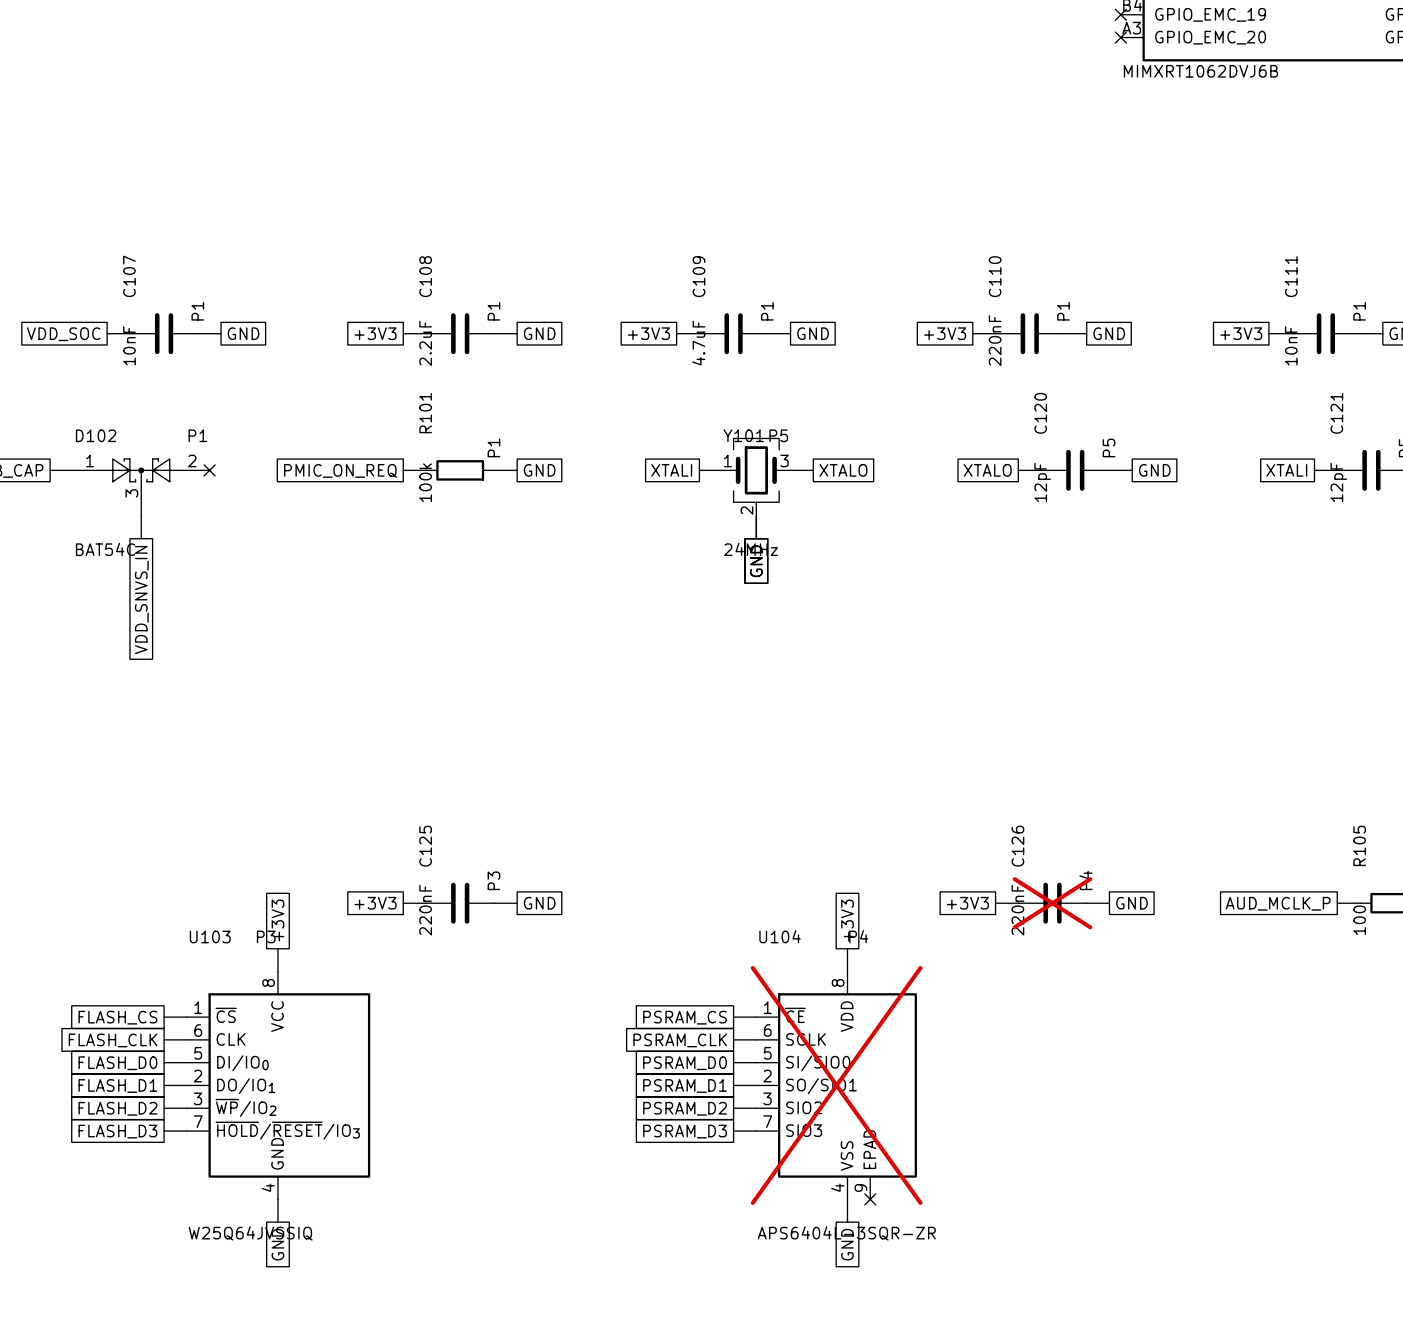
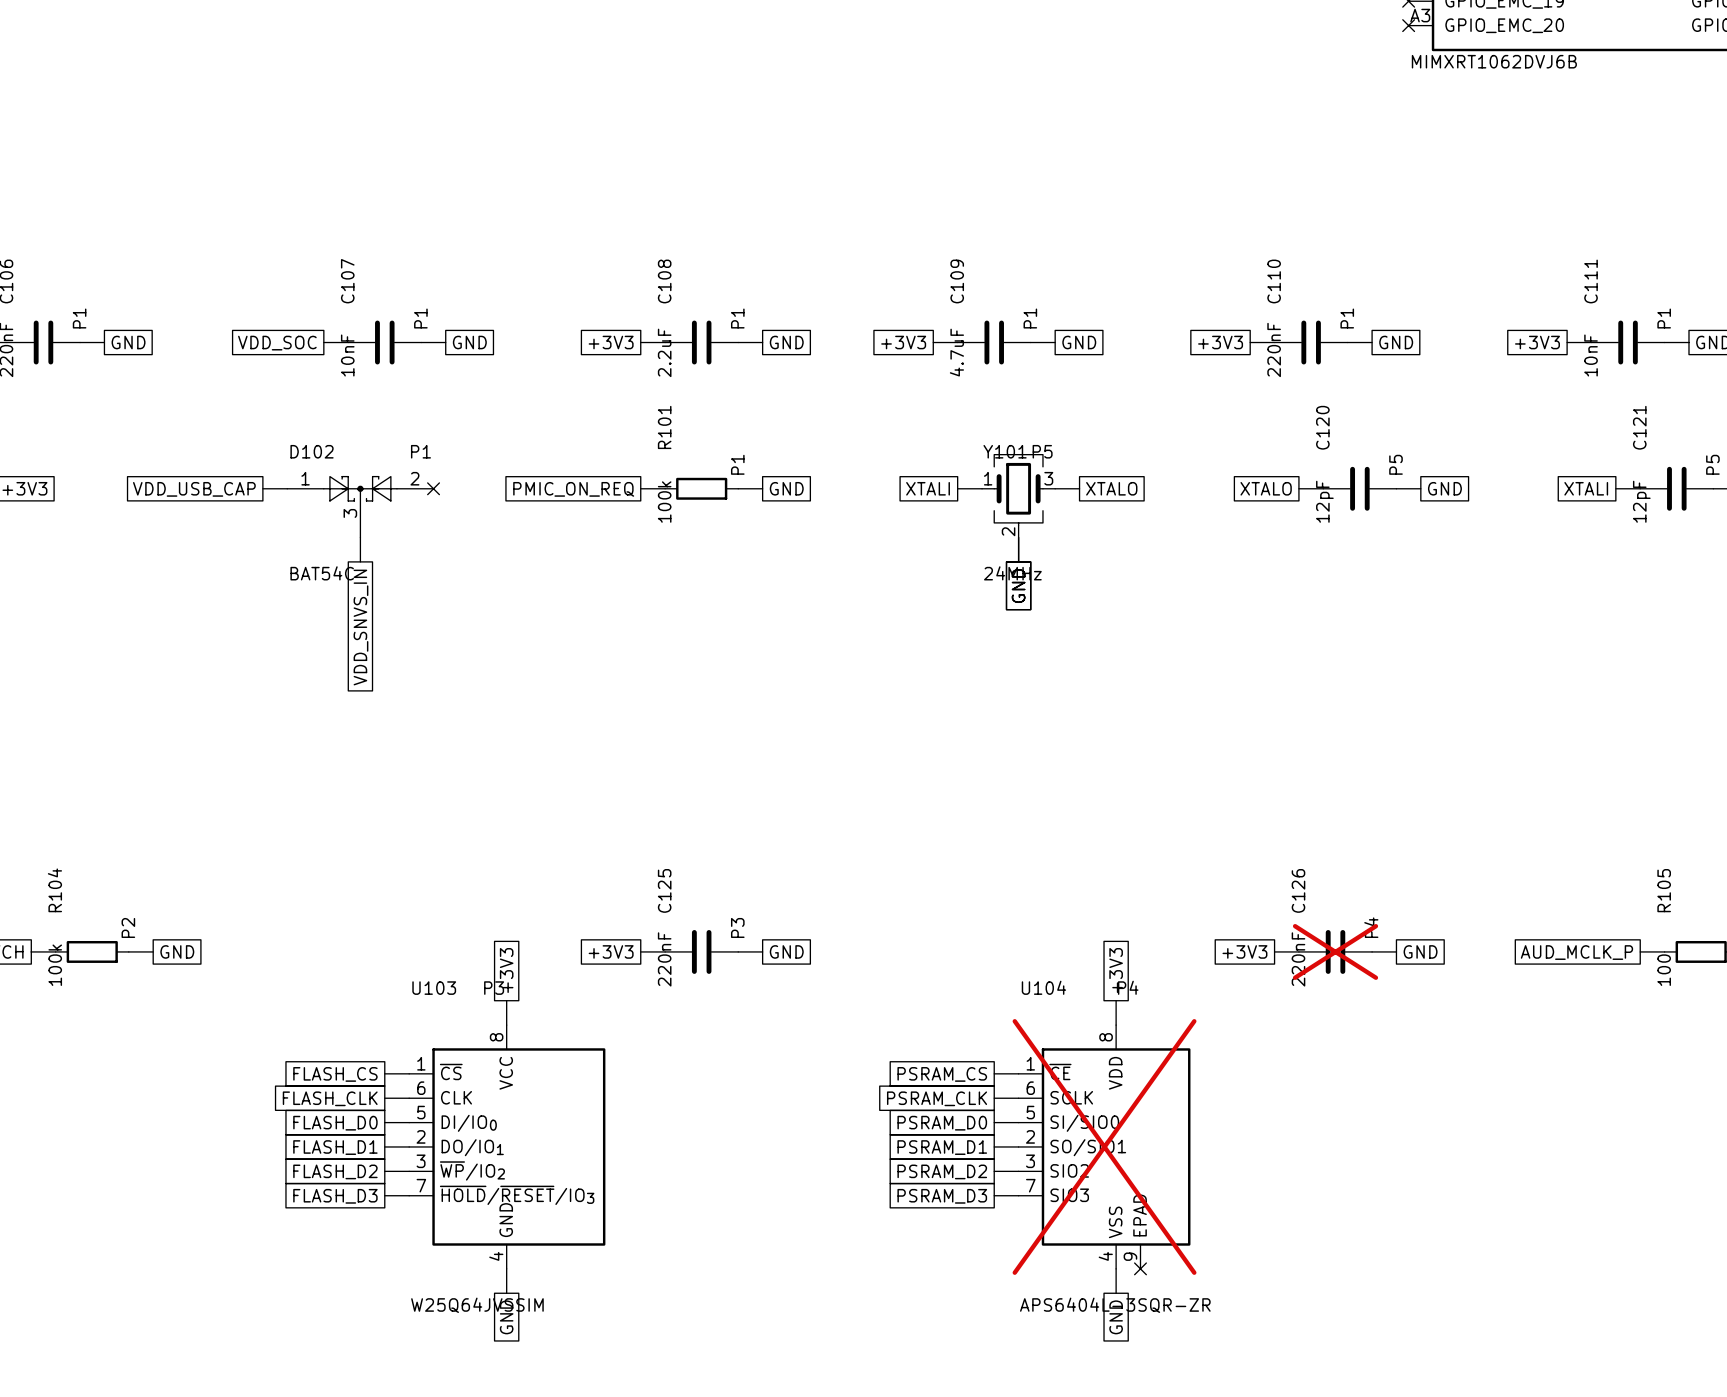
U103 value: W25Q64JVSSIQ (250, 1233) -> W25Q64JVSSIM (477, 1305)

